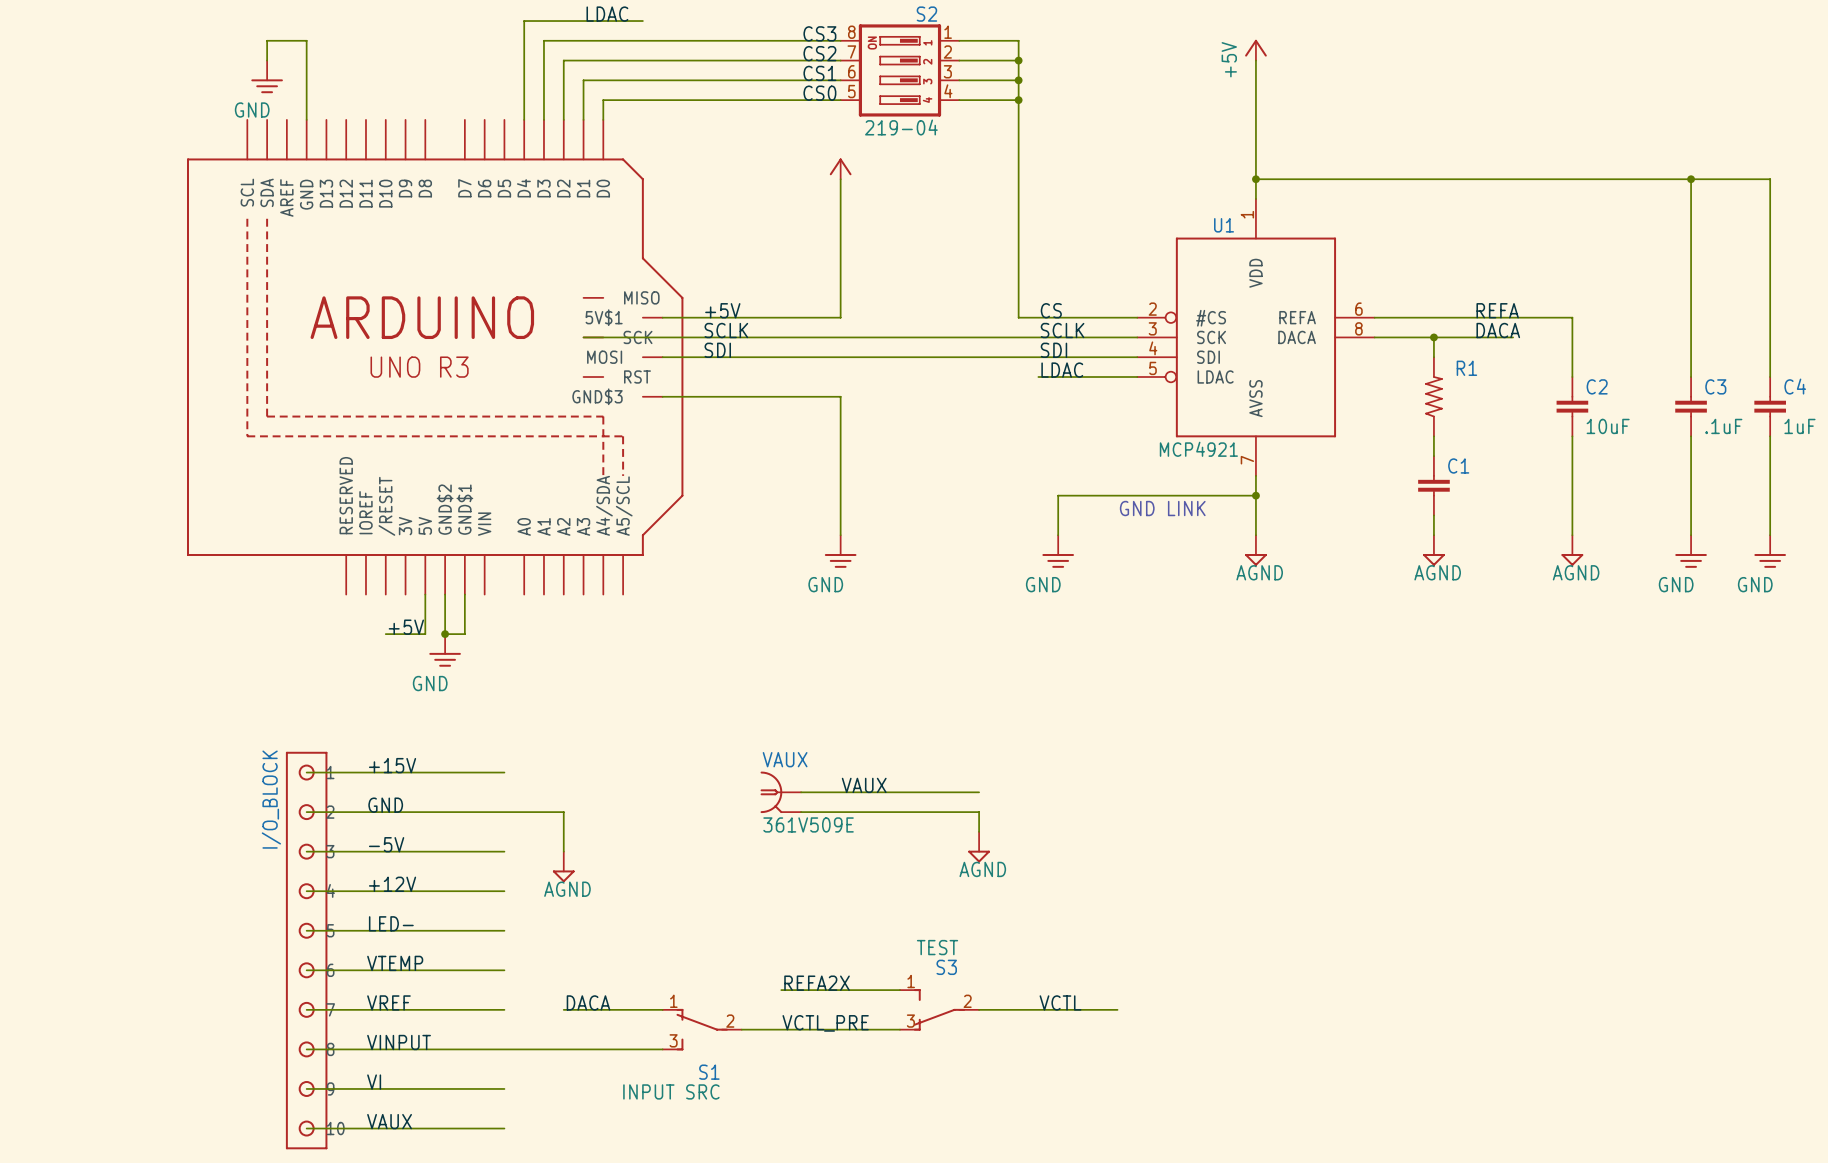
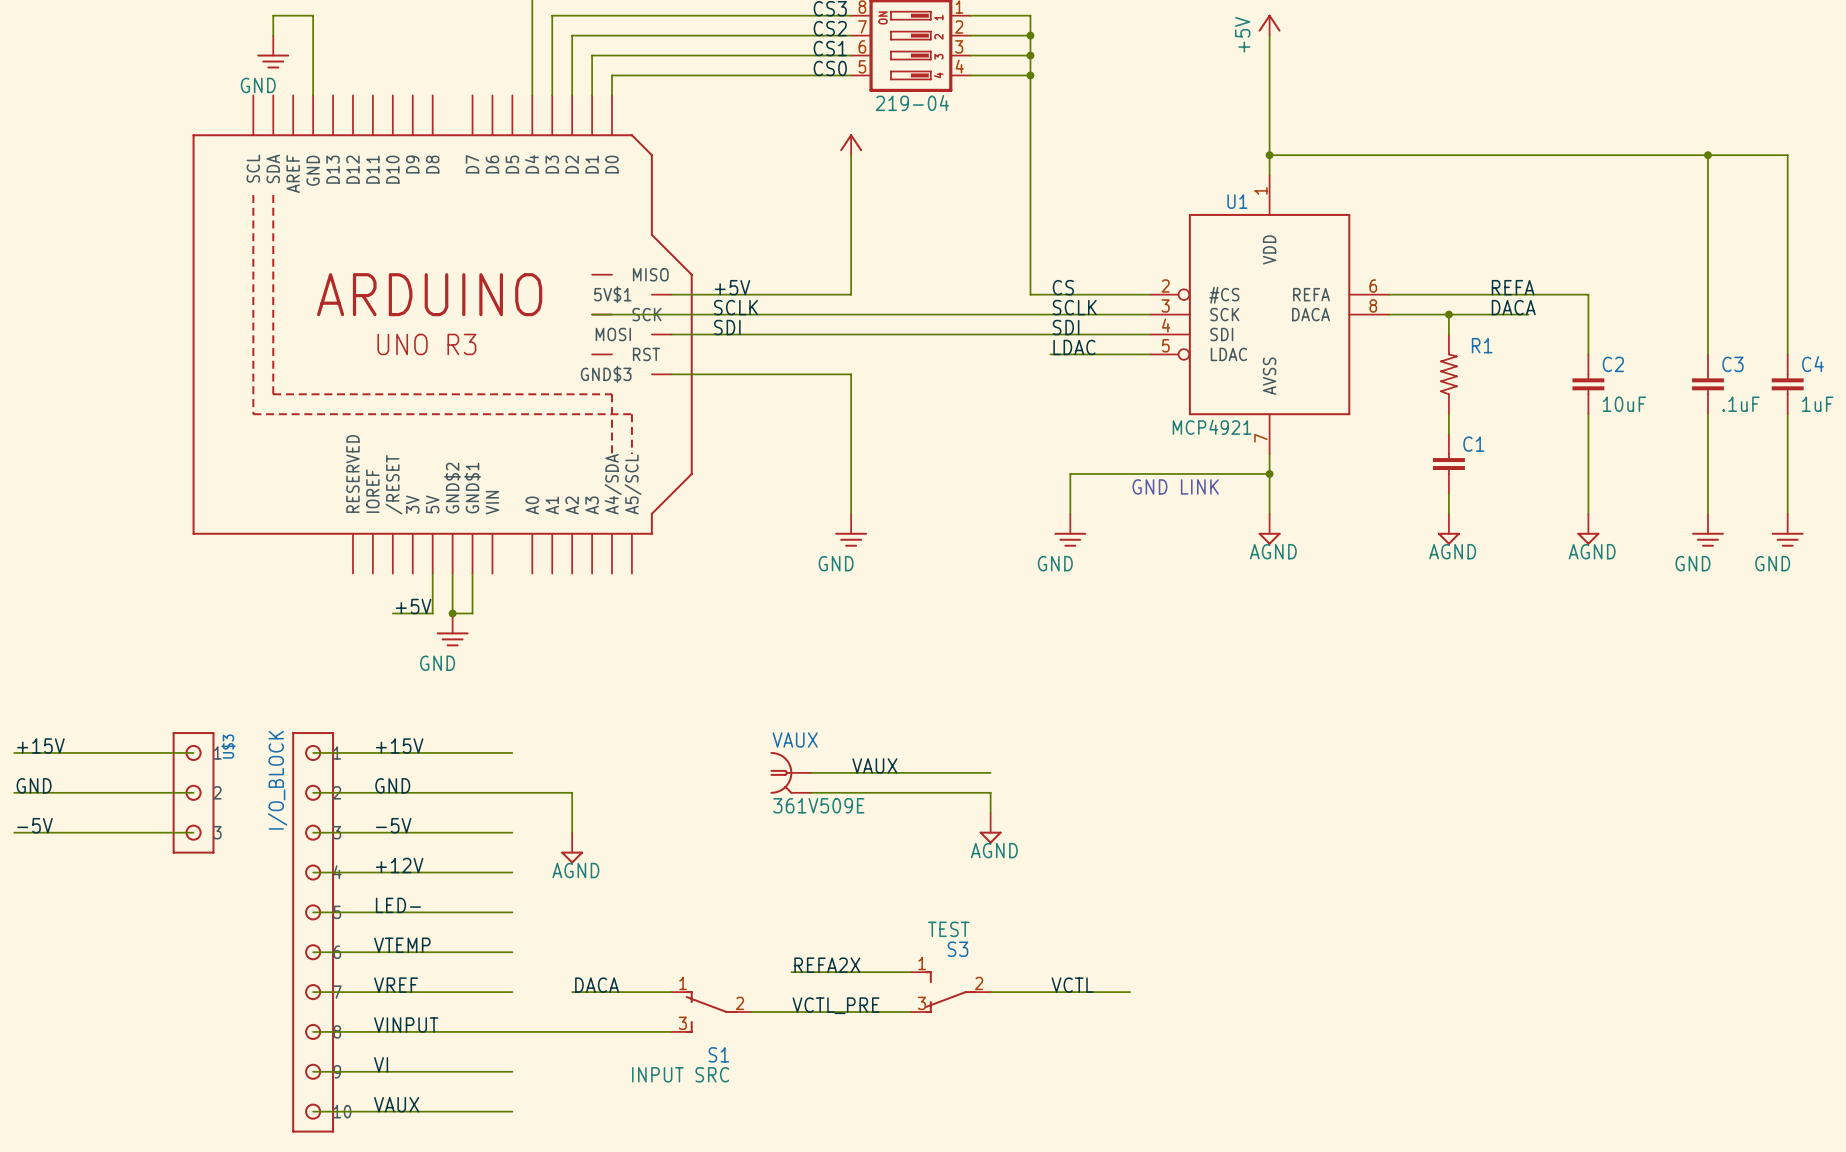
label: none -> +15V (40, 745)
wire: none -> (14, 752) (193, 752)
label: none -> GND (34, 785)
wire: none -> (14, 792) (193, 792)
U$3: none -> (193, 792)
label: none -> -5V (34, 825)
wire: none -> (14, 832) (193, 832)

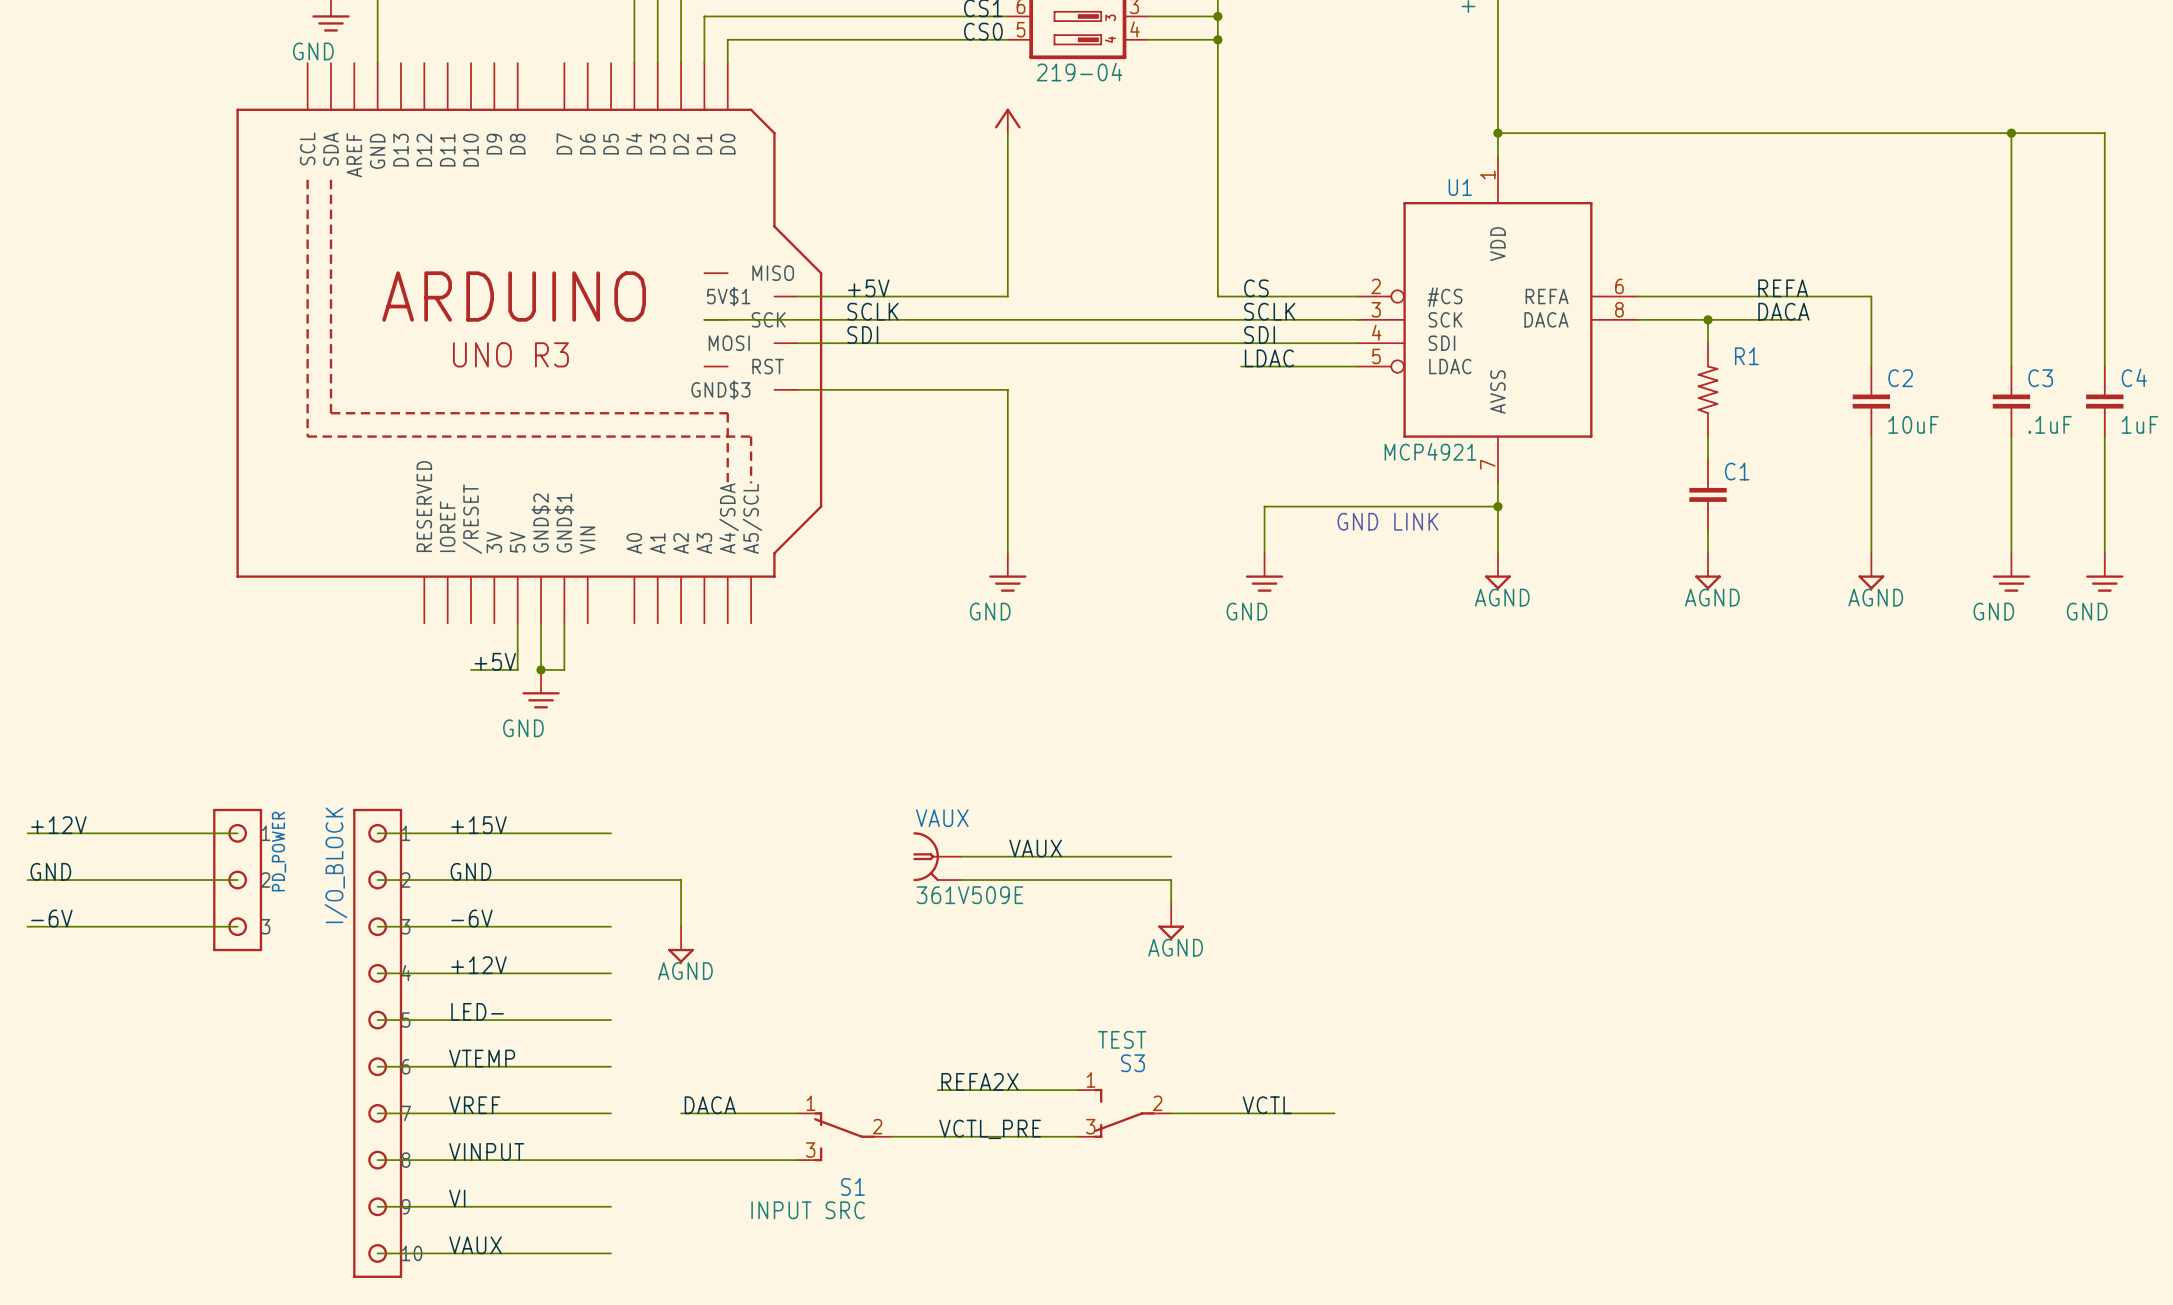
label: +15V (40, 745) -> +12V (58, 825)
U$3 name: U$3 (228, 746) -> PD_POWER (279, 851)
label: -5V (34, 825) -> -6V (51, 918)
label: -5V (393, 825) -> -6V (471, 918)

